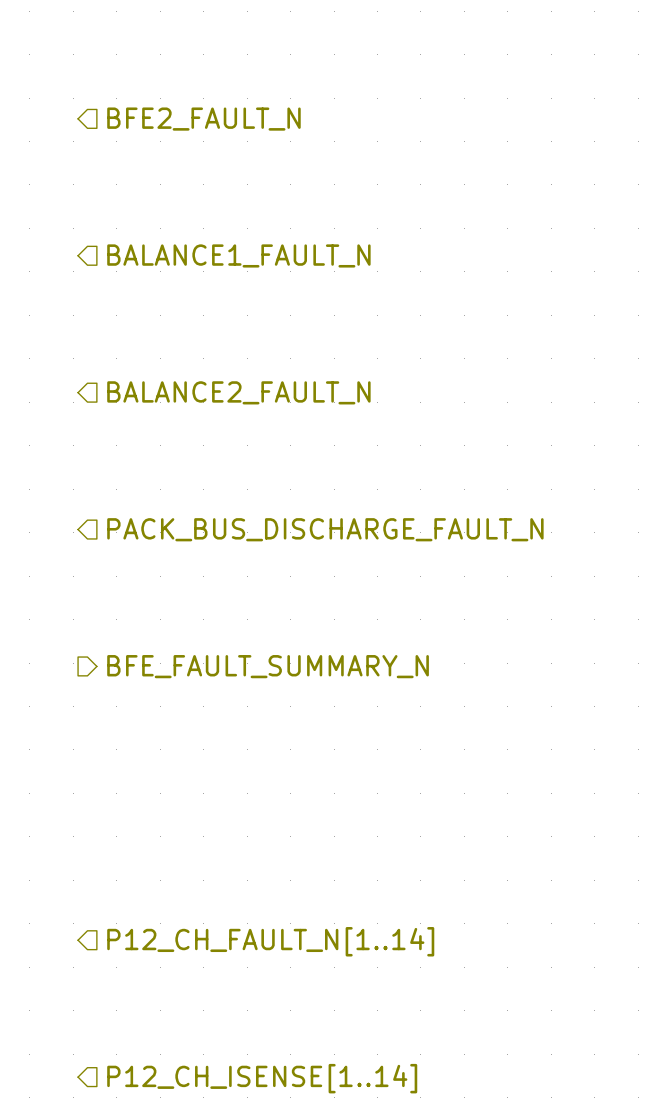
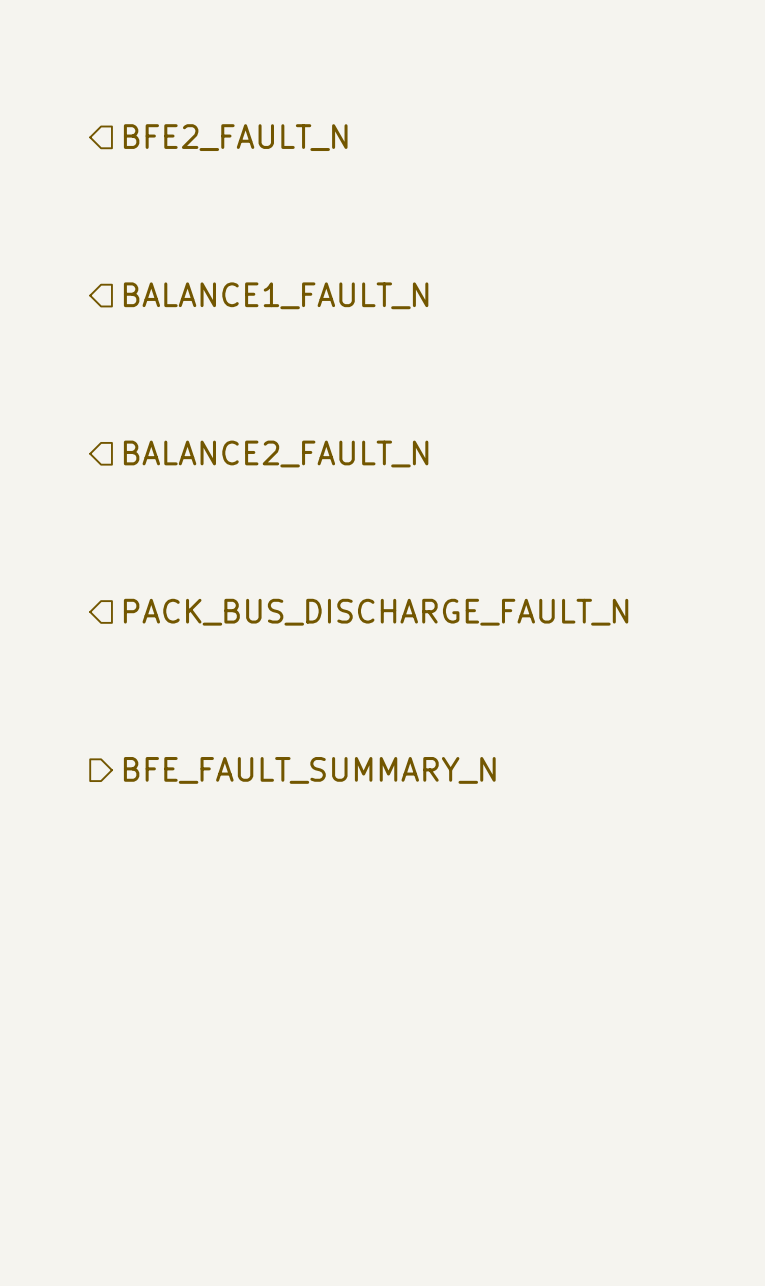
hierarchical label: P12_CH_FAULT_N[1..14] (270, 941) -> none
hierarchical label: P12_CH_ISENSE[1..14] (262, 1078) -> none

